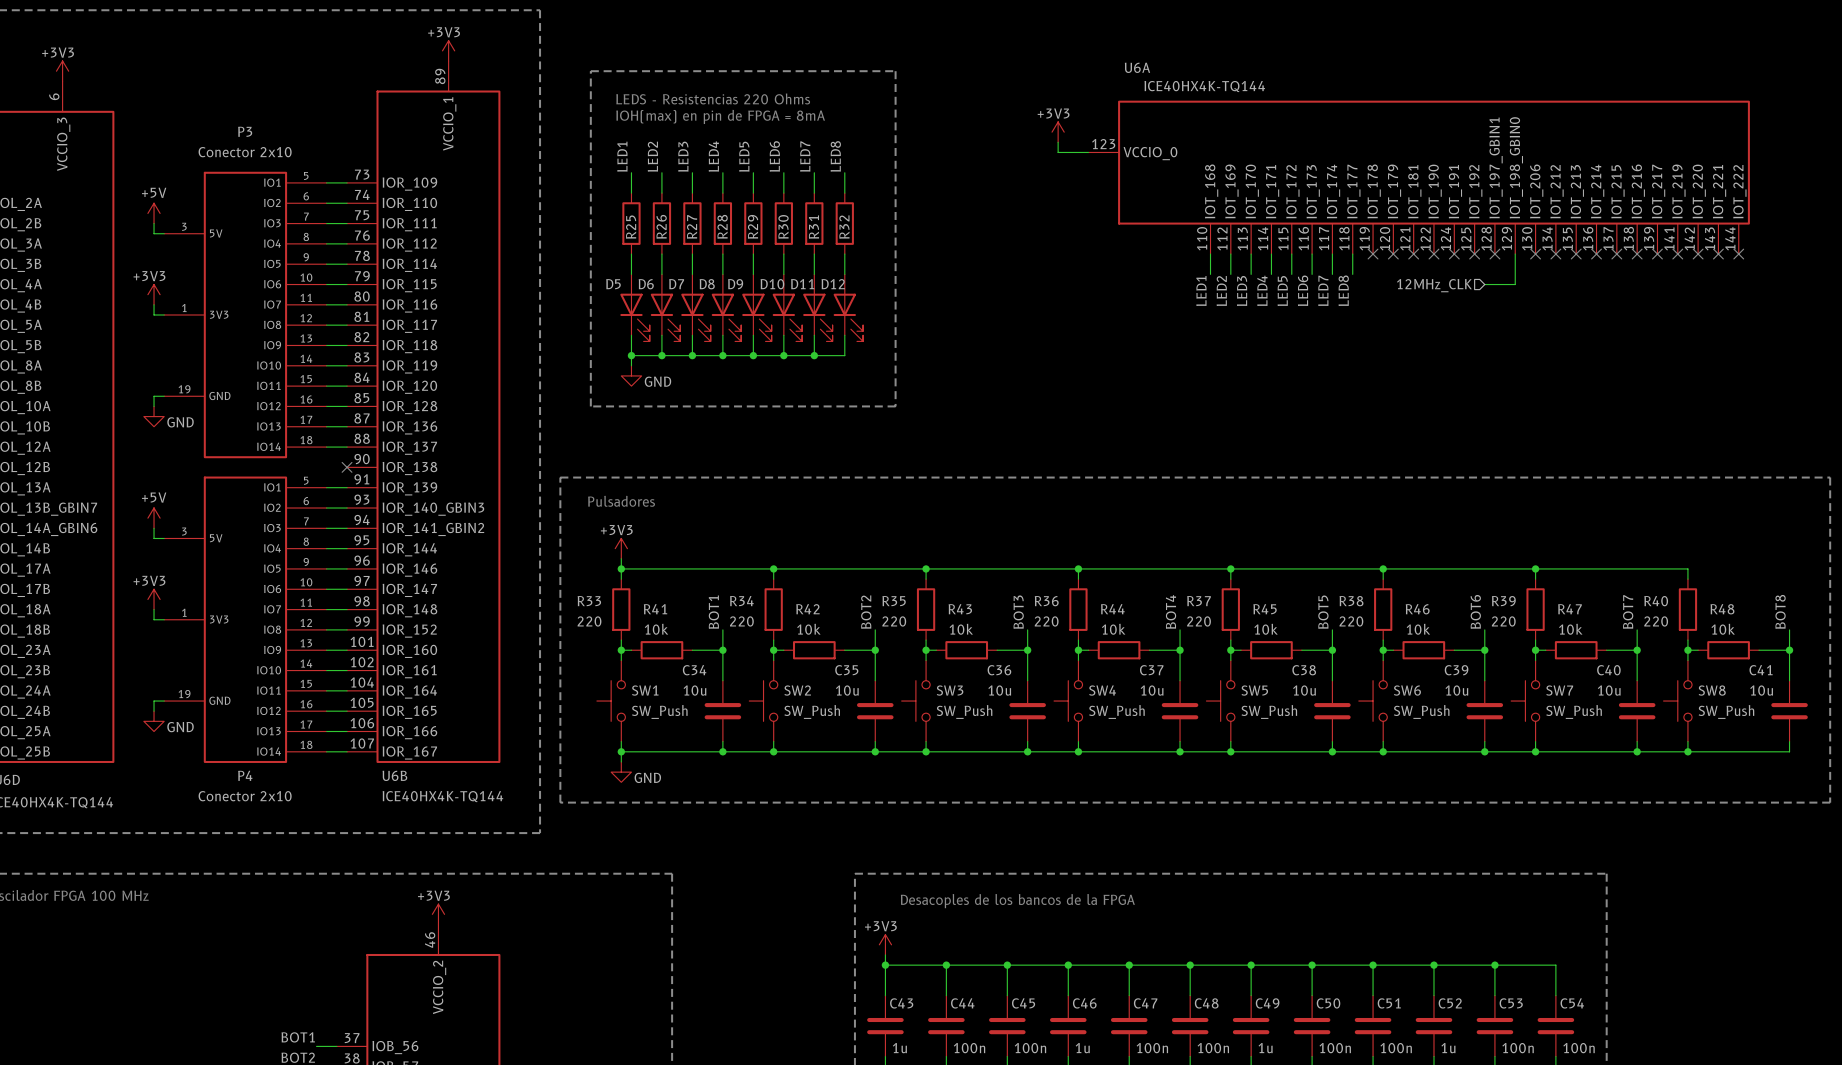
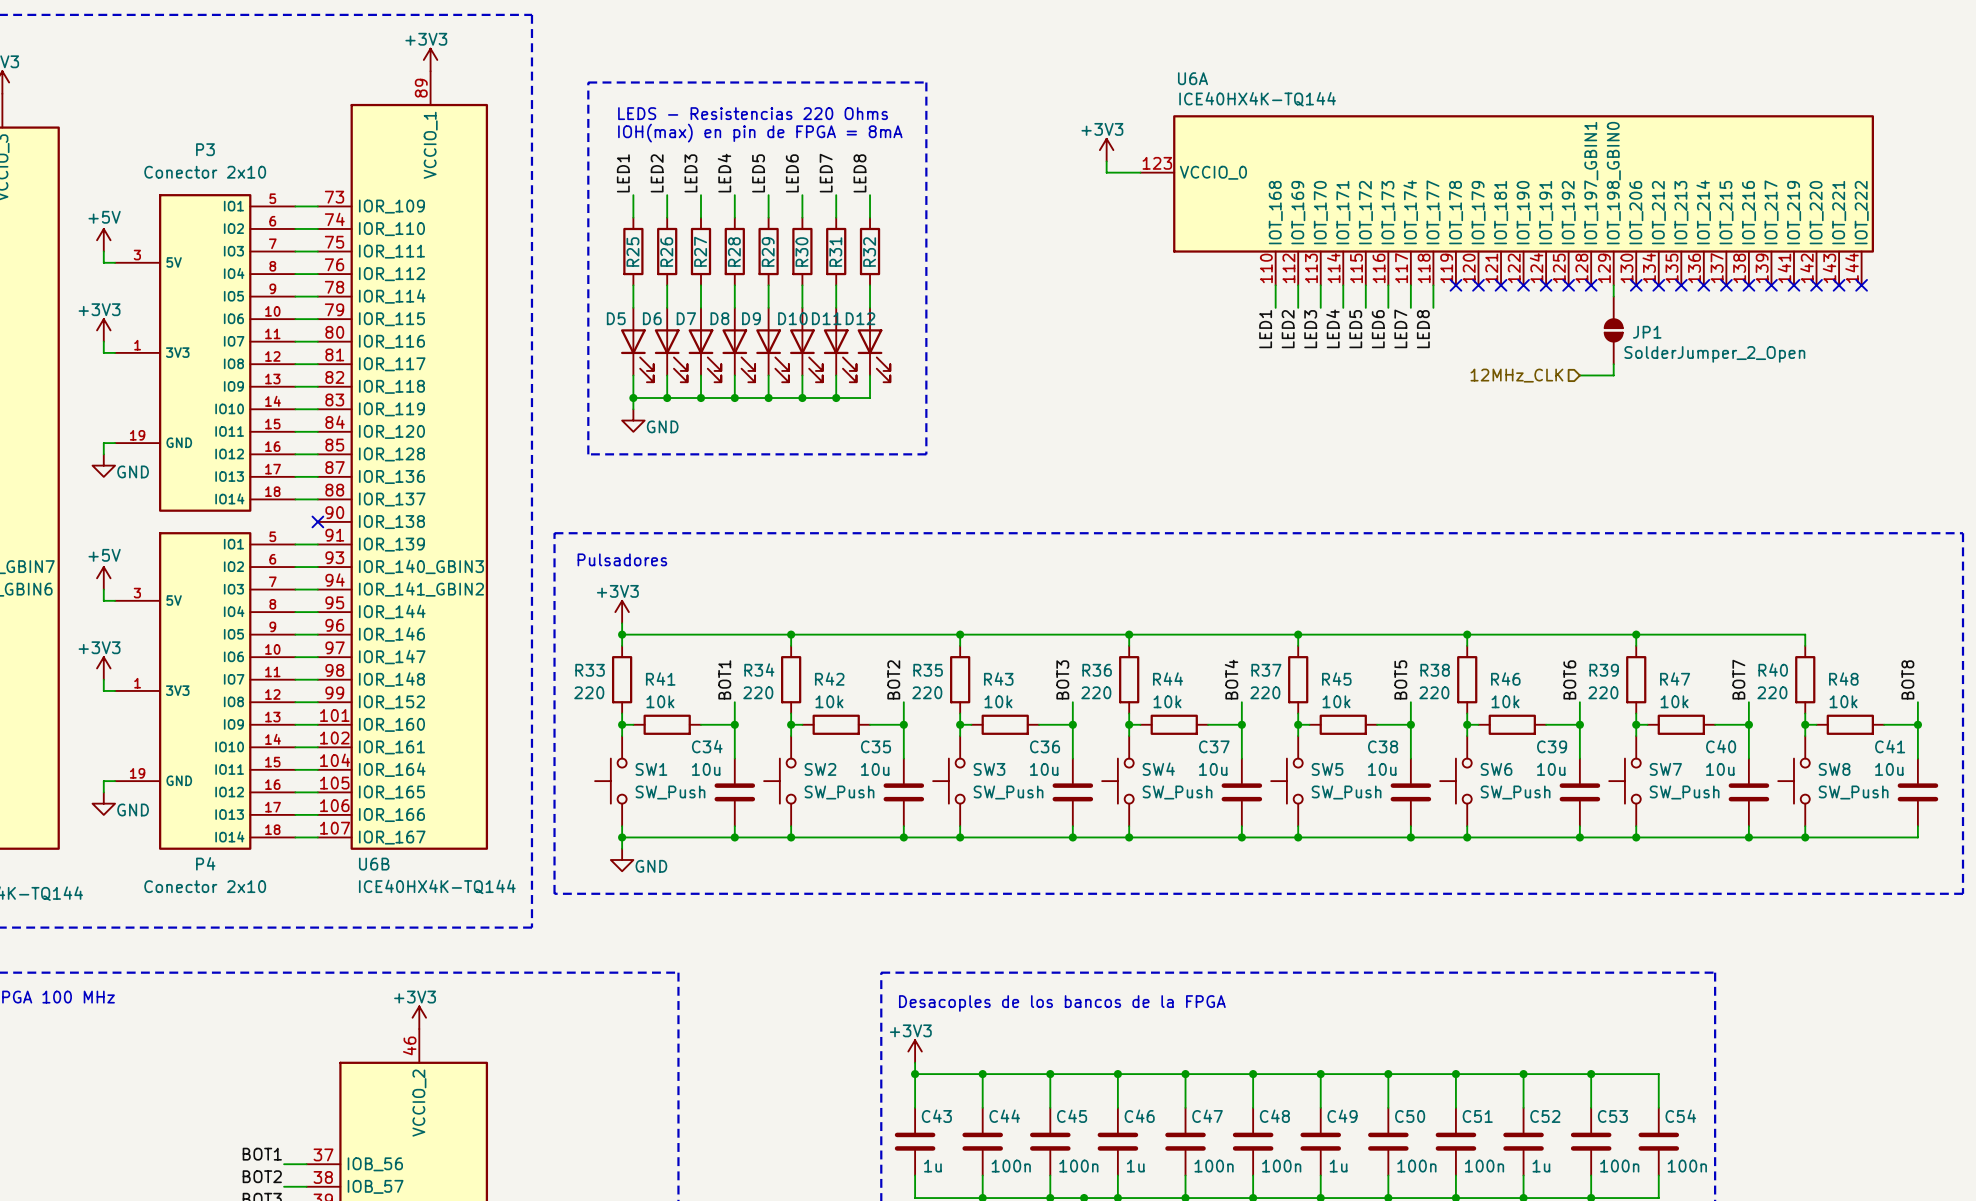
wire: (1515, 264) (1515, 284) (1484, 284) -> none
hierarchical label position: 12MHz_CLK (1434, 285) -> 12MHz_CLK (1516, 375)
JP1: none -> SolderJumper_2_Open (1613, 330)
wire: none -> (1613, 364) (1613, 375) (1579, 375)

